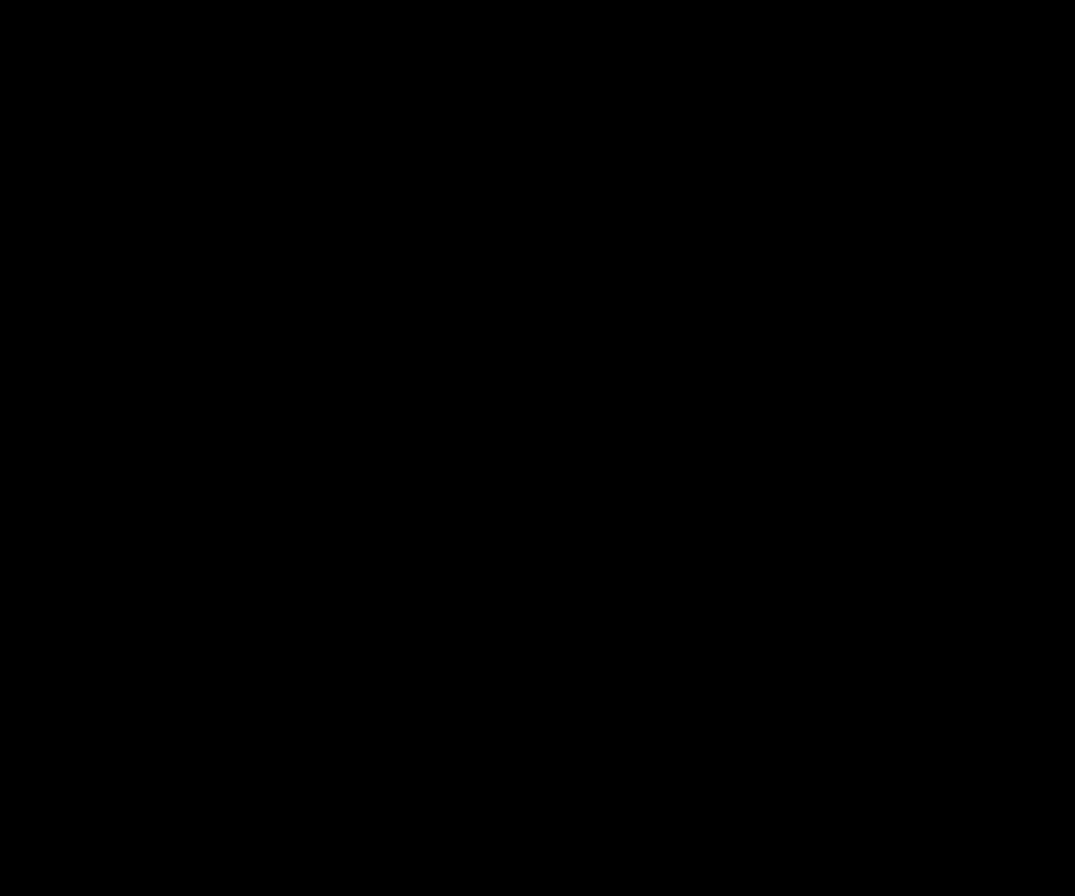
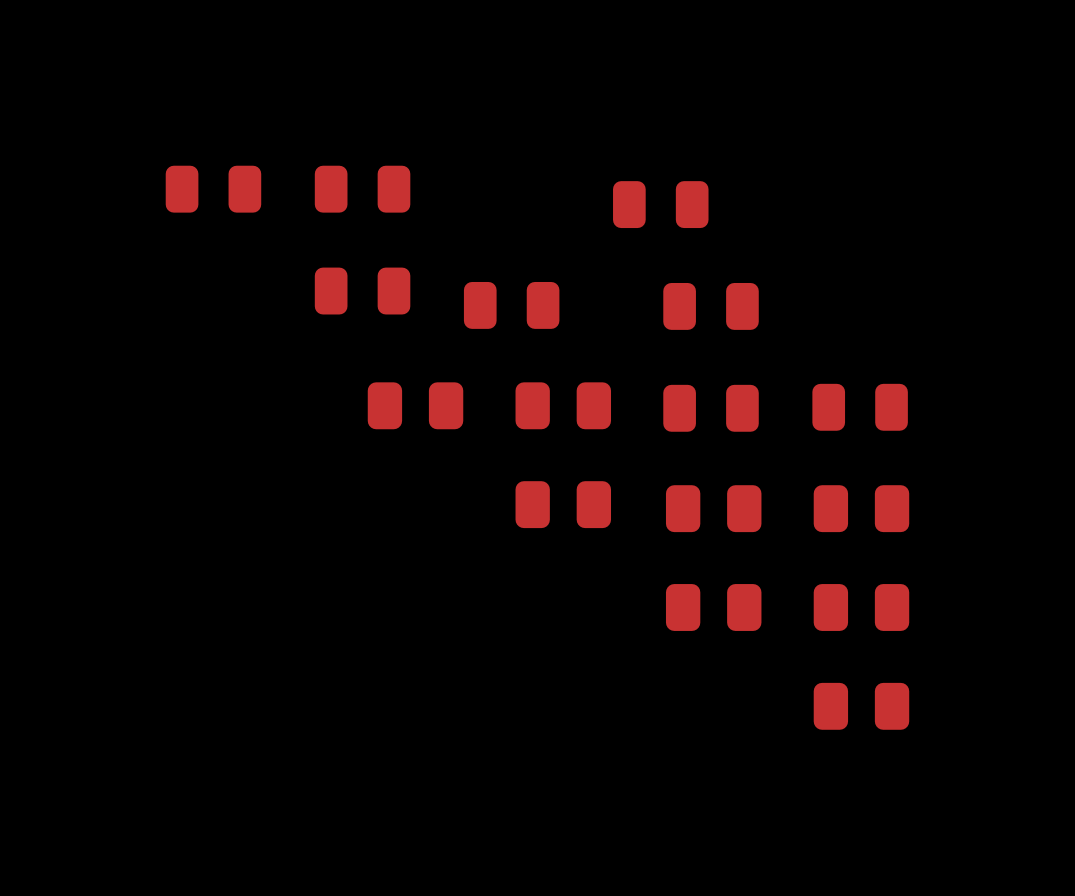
part: none -> (213, 189)
part: none -> (362, 189)
part: none -> (660, 204)
part: none -> (362, 291)
part: none -> (511, 305)
part: none -> (711, 306)
part: none -> (415, 405)
part: none -> (563, 405)
part: none -> (860, 407)
part: none -> (711, 408)
part: none -> (563, 504)
part: none -> (713, 508)
part: none -> (861, 508)
part: none -> (713, 607)
part: none -> (861, 607)
part: none -> (861, 706)

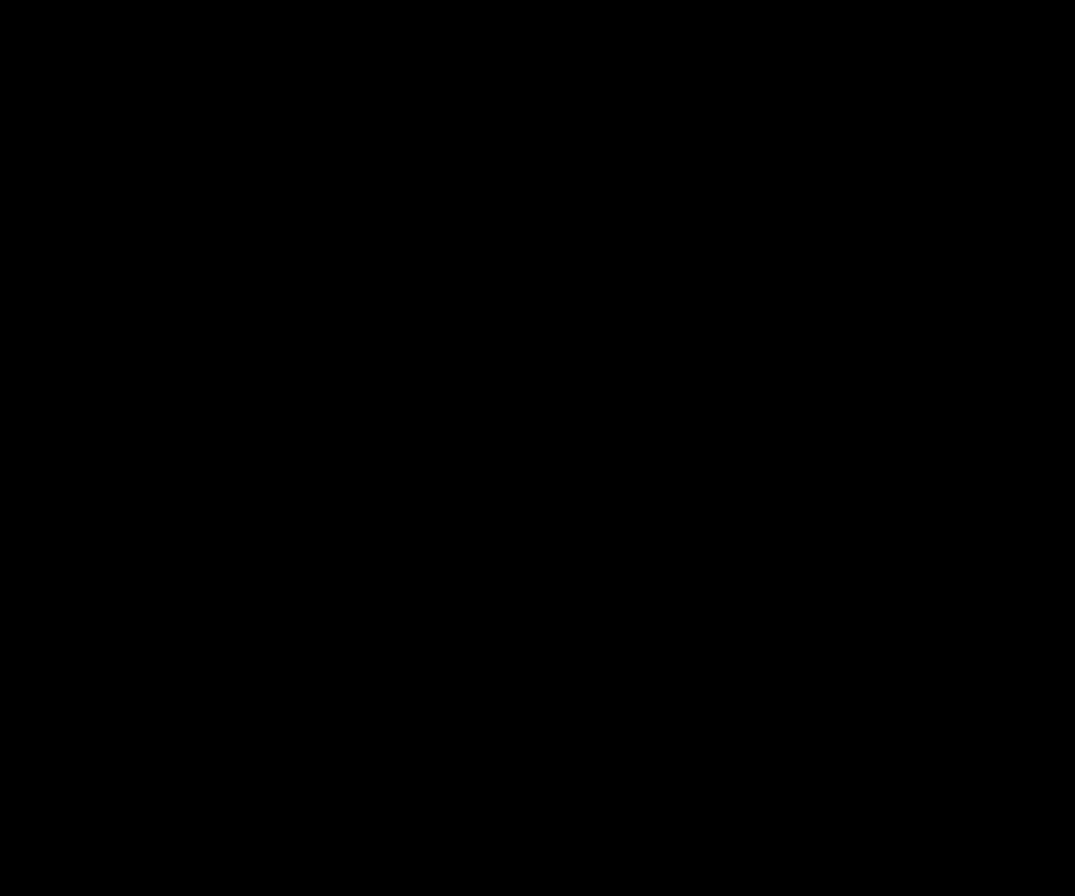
part: (213, 189) -> none
part: (362, 189) -> none
part: (660, 204) -> none
part: (362, 291) -> none
part: (511, 305) -> none
part: (711, 306) -> none
part: (415, 405) -> none
part: (563, 405) -> none
part: (860, 407) -> none
part: (711, 408) -> none
part: (563, 504) -> none
part: (713, 508) -> none
part: (861, 508) -> none
part: (713, 607) -> none
part: (861, 607) -> none
part: (861, 706) -> none

